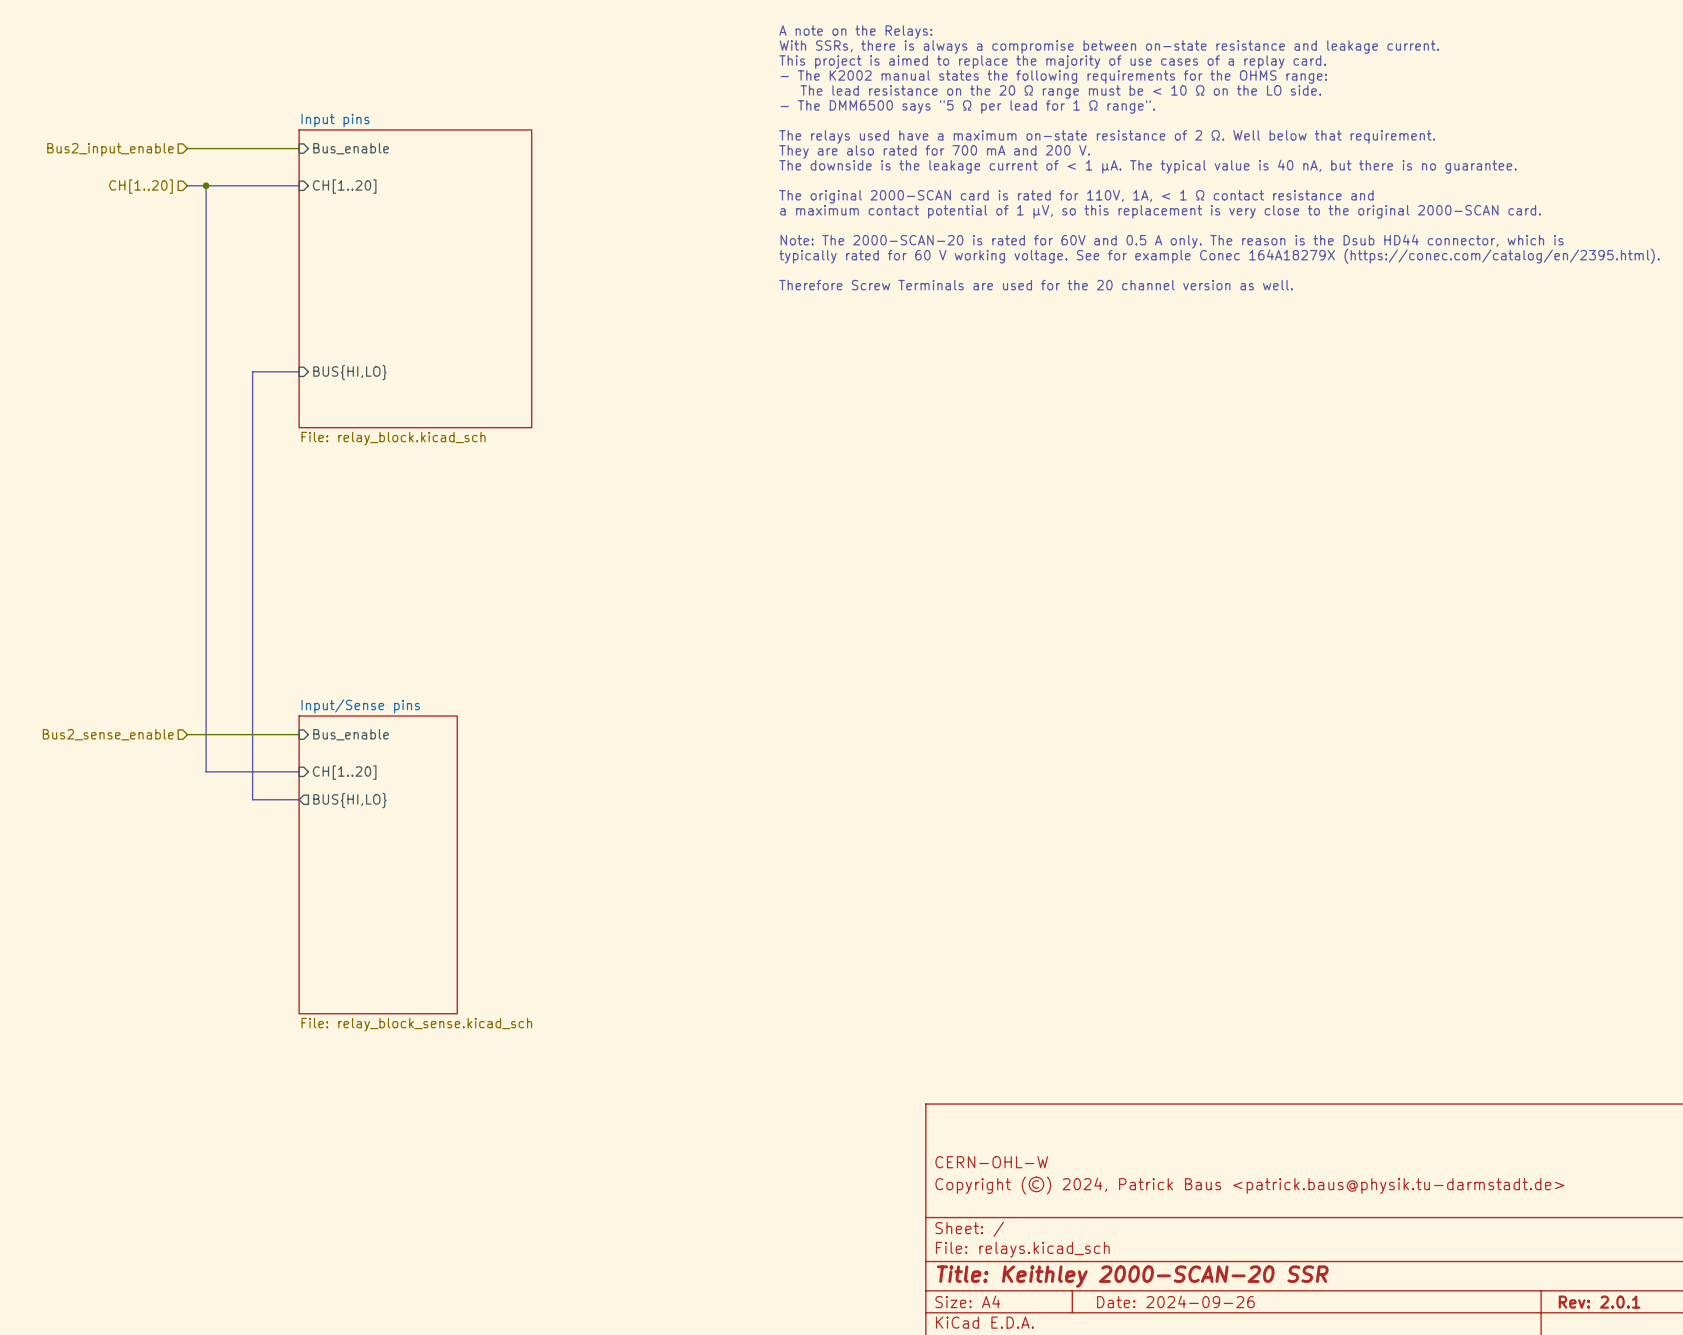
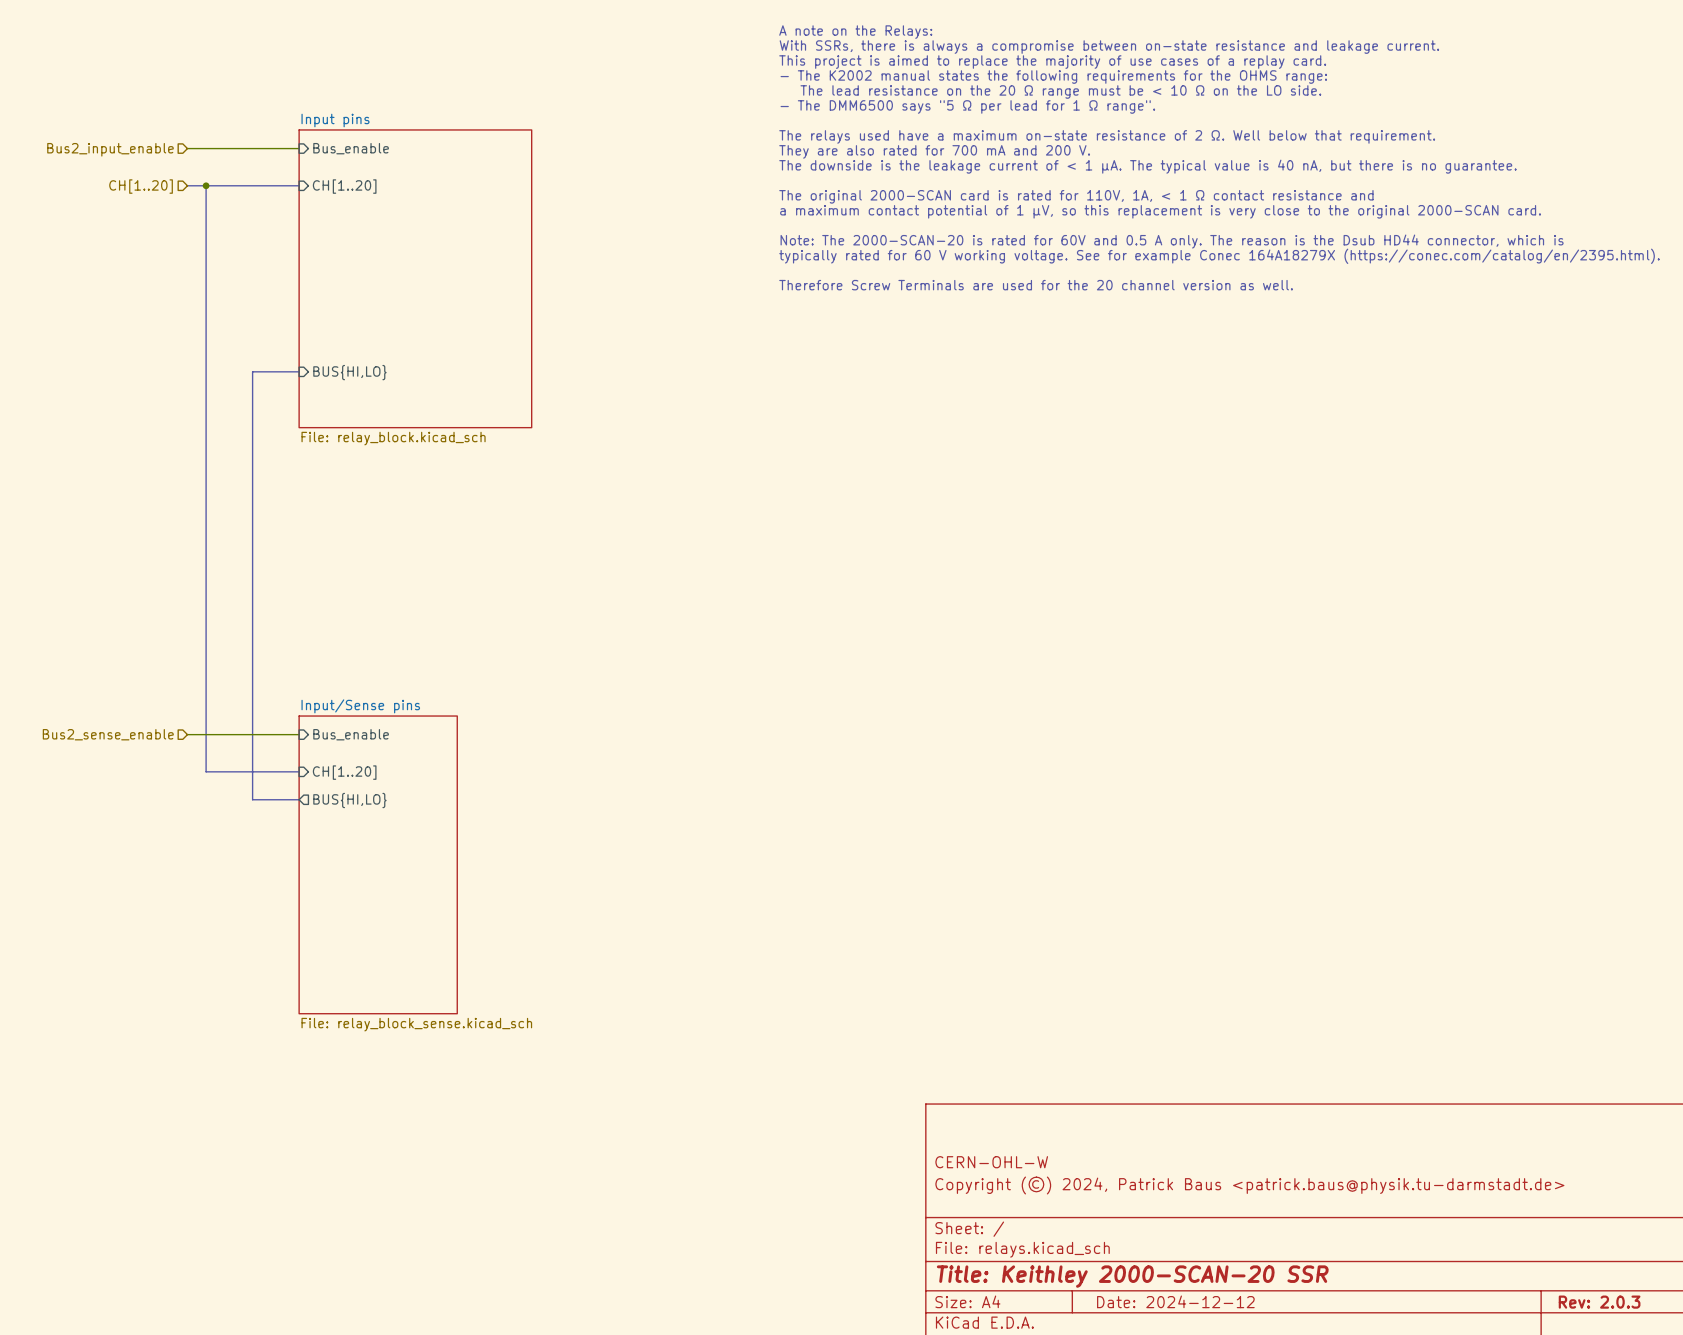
title block: Date: 2024-09-26 (1175, 1301) -> Date: 2024-12-12 (1175, 1301)
title block: Rev: 2.0.1 (1599, 1302) -> Rev: 2.0.3 (1599, 1302)

